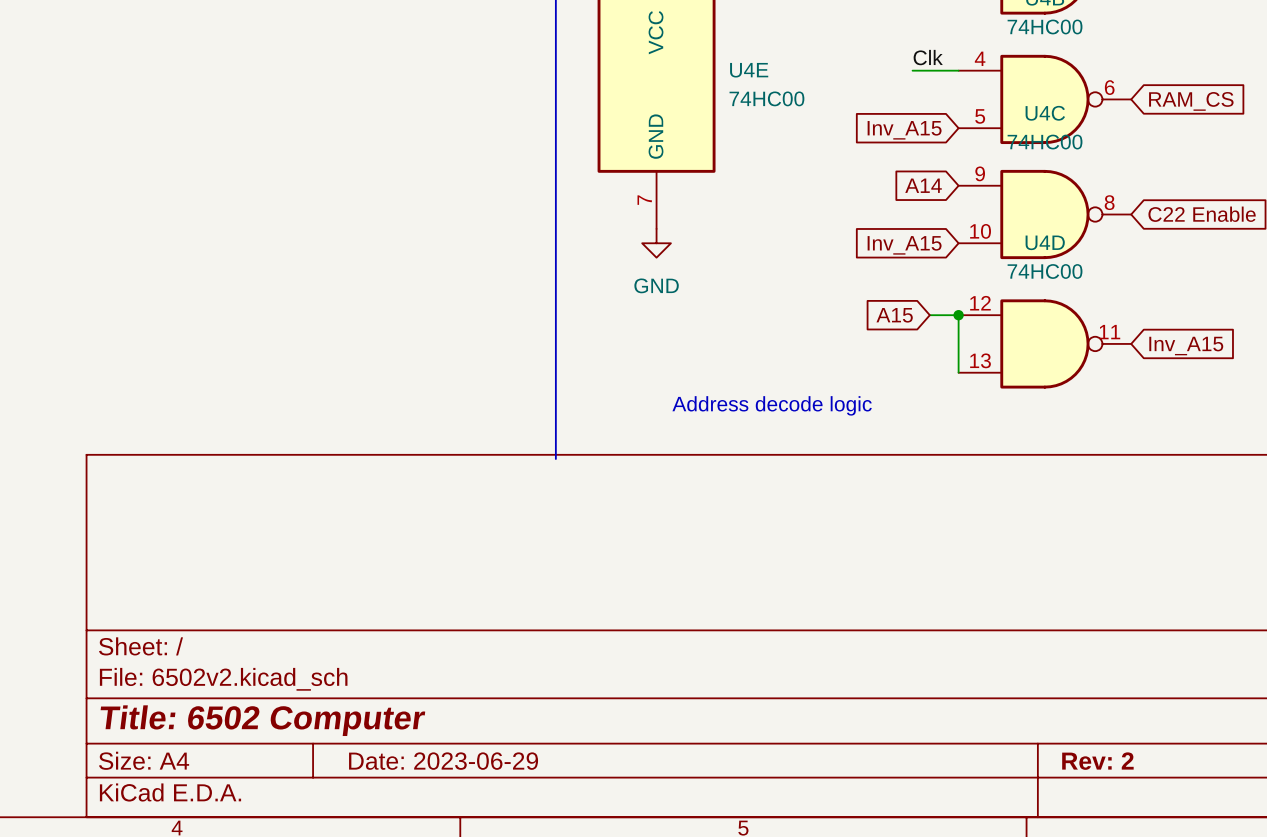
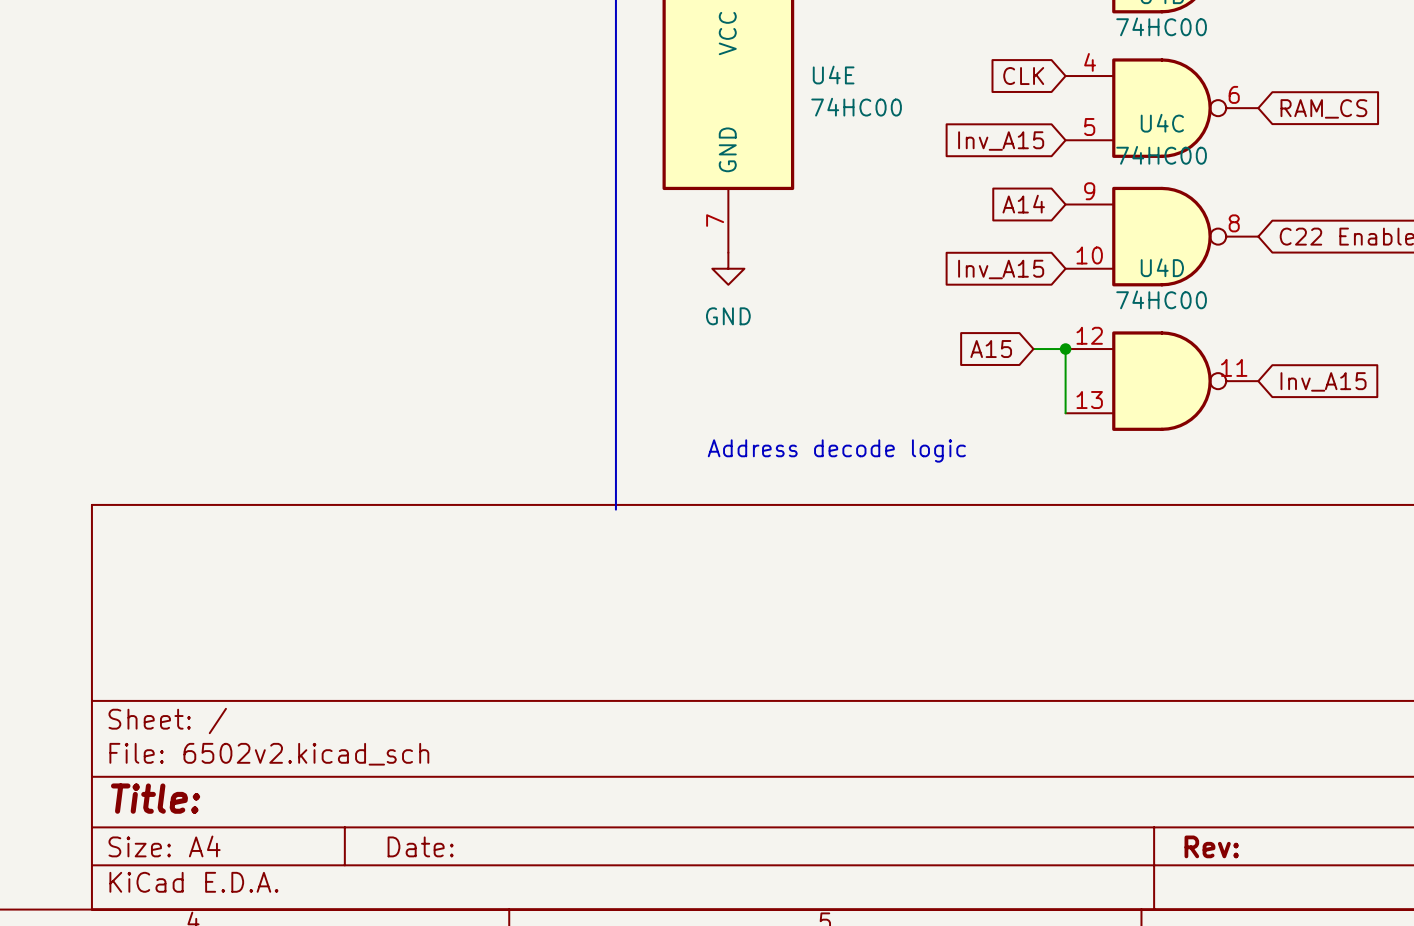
label: Clk (928, 57) -> none
wire: (912, 70) (958, 70) -> none
global label: none -> CLK (1023, 76)
title block: Title: 6502 Computer (262, 720) -> Title: (155, 798)
title block: Date: 2023-06-29 (443, 761) -> Date: (420, 846)
title block: Rev: 2 (1097, 761) -> Rev: (1211, 846)

